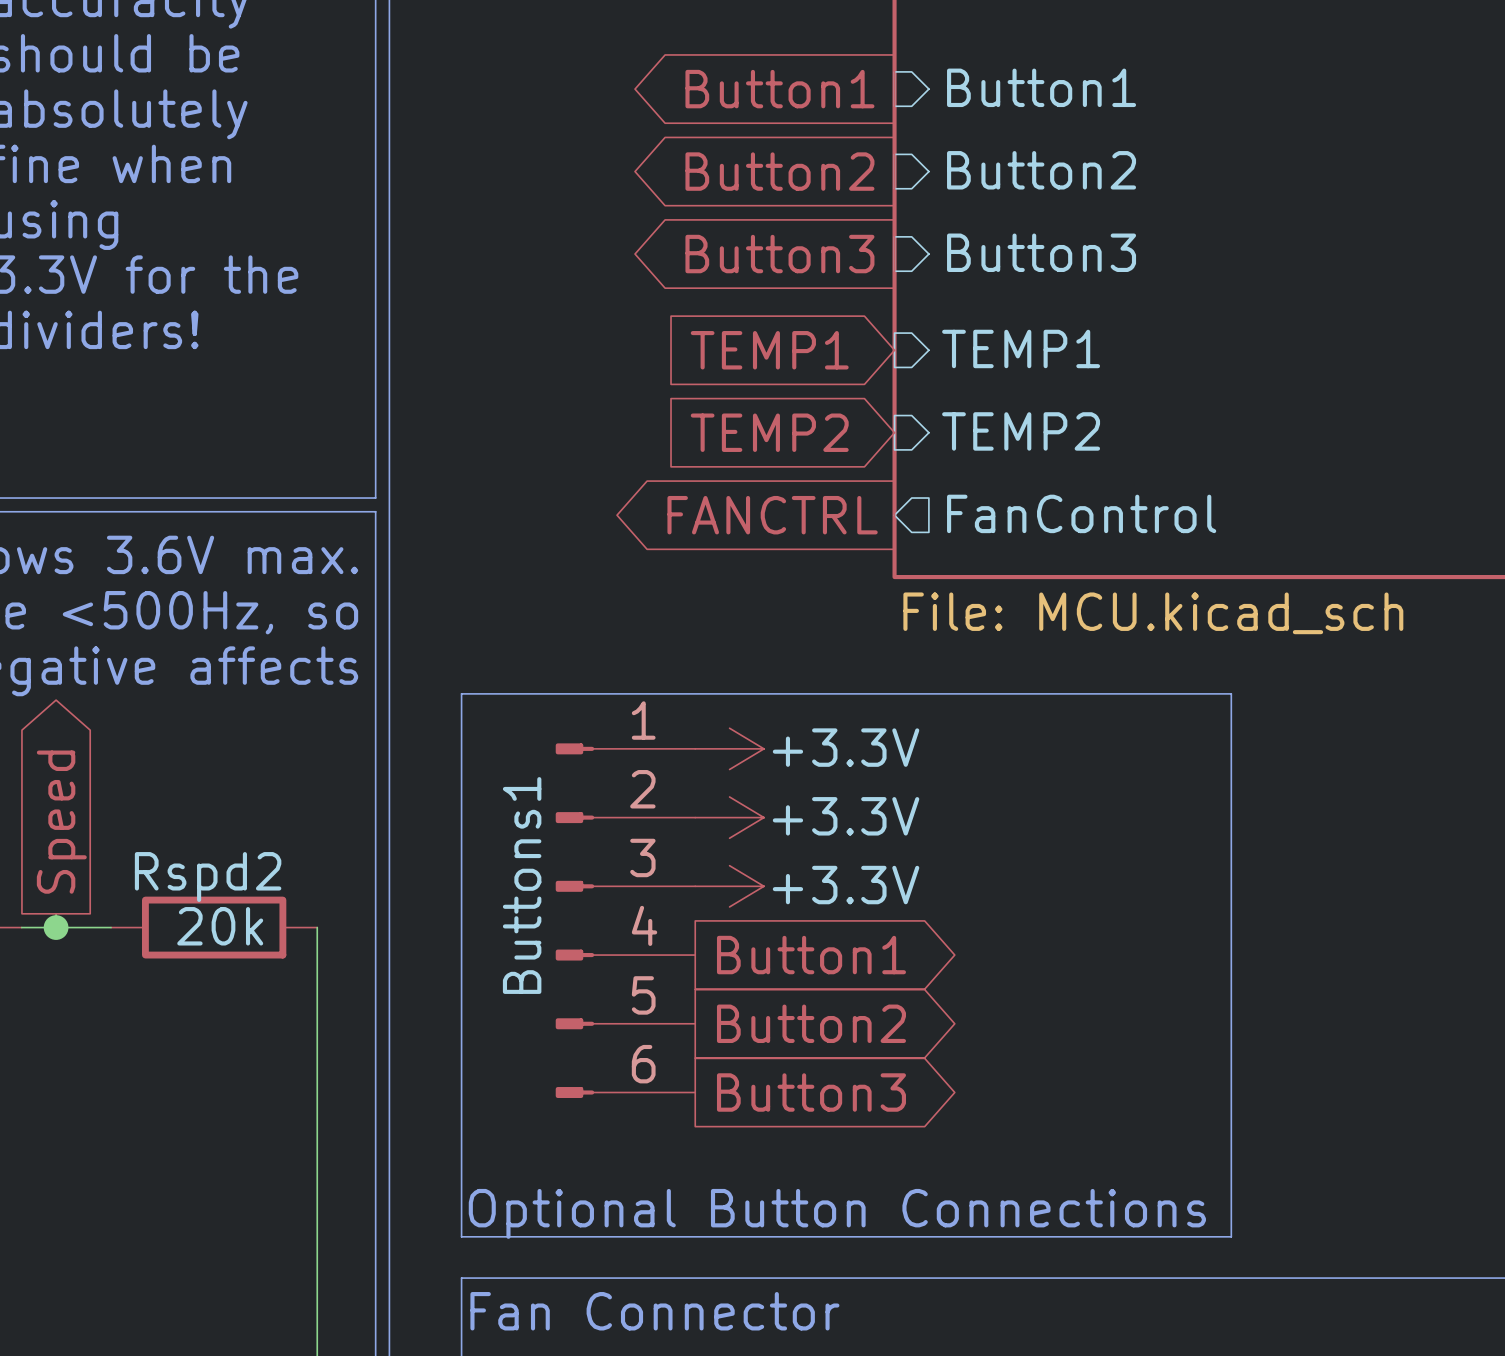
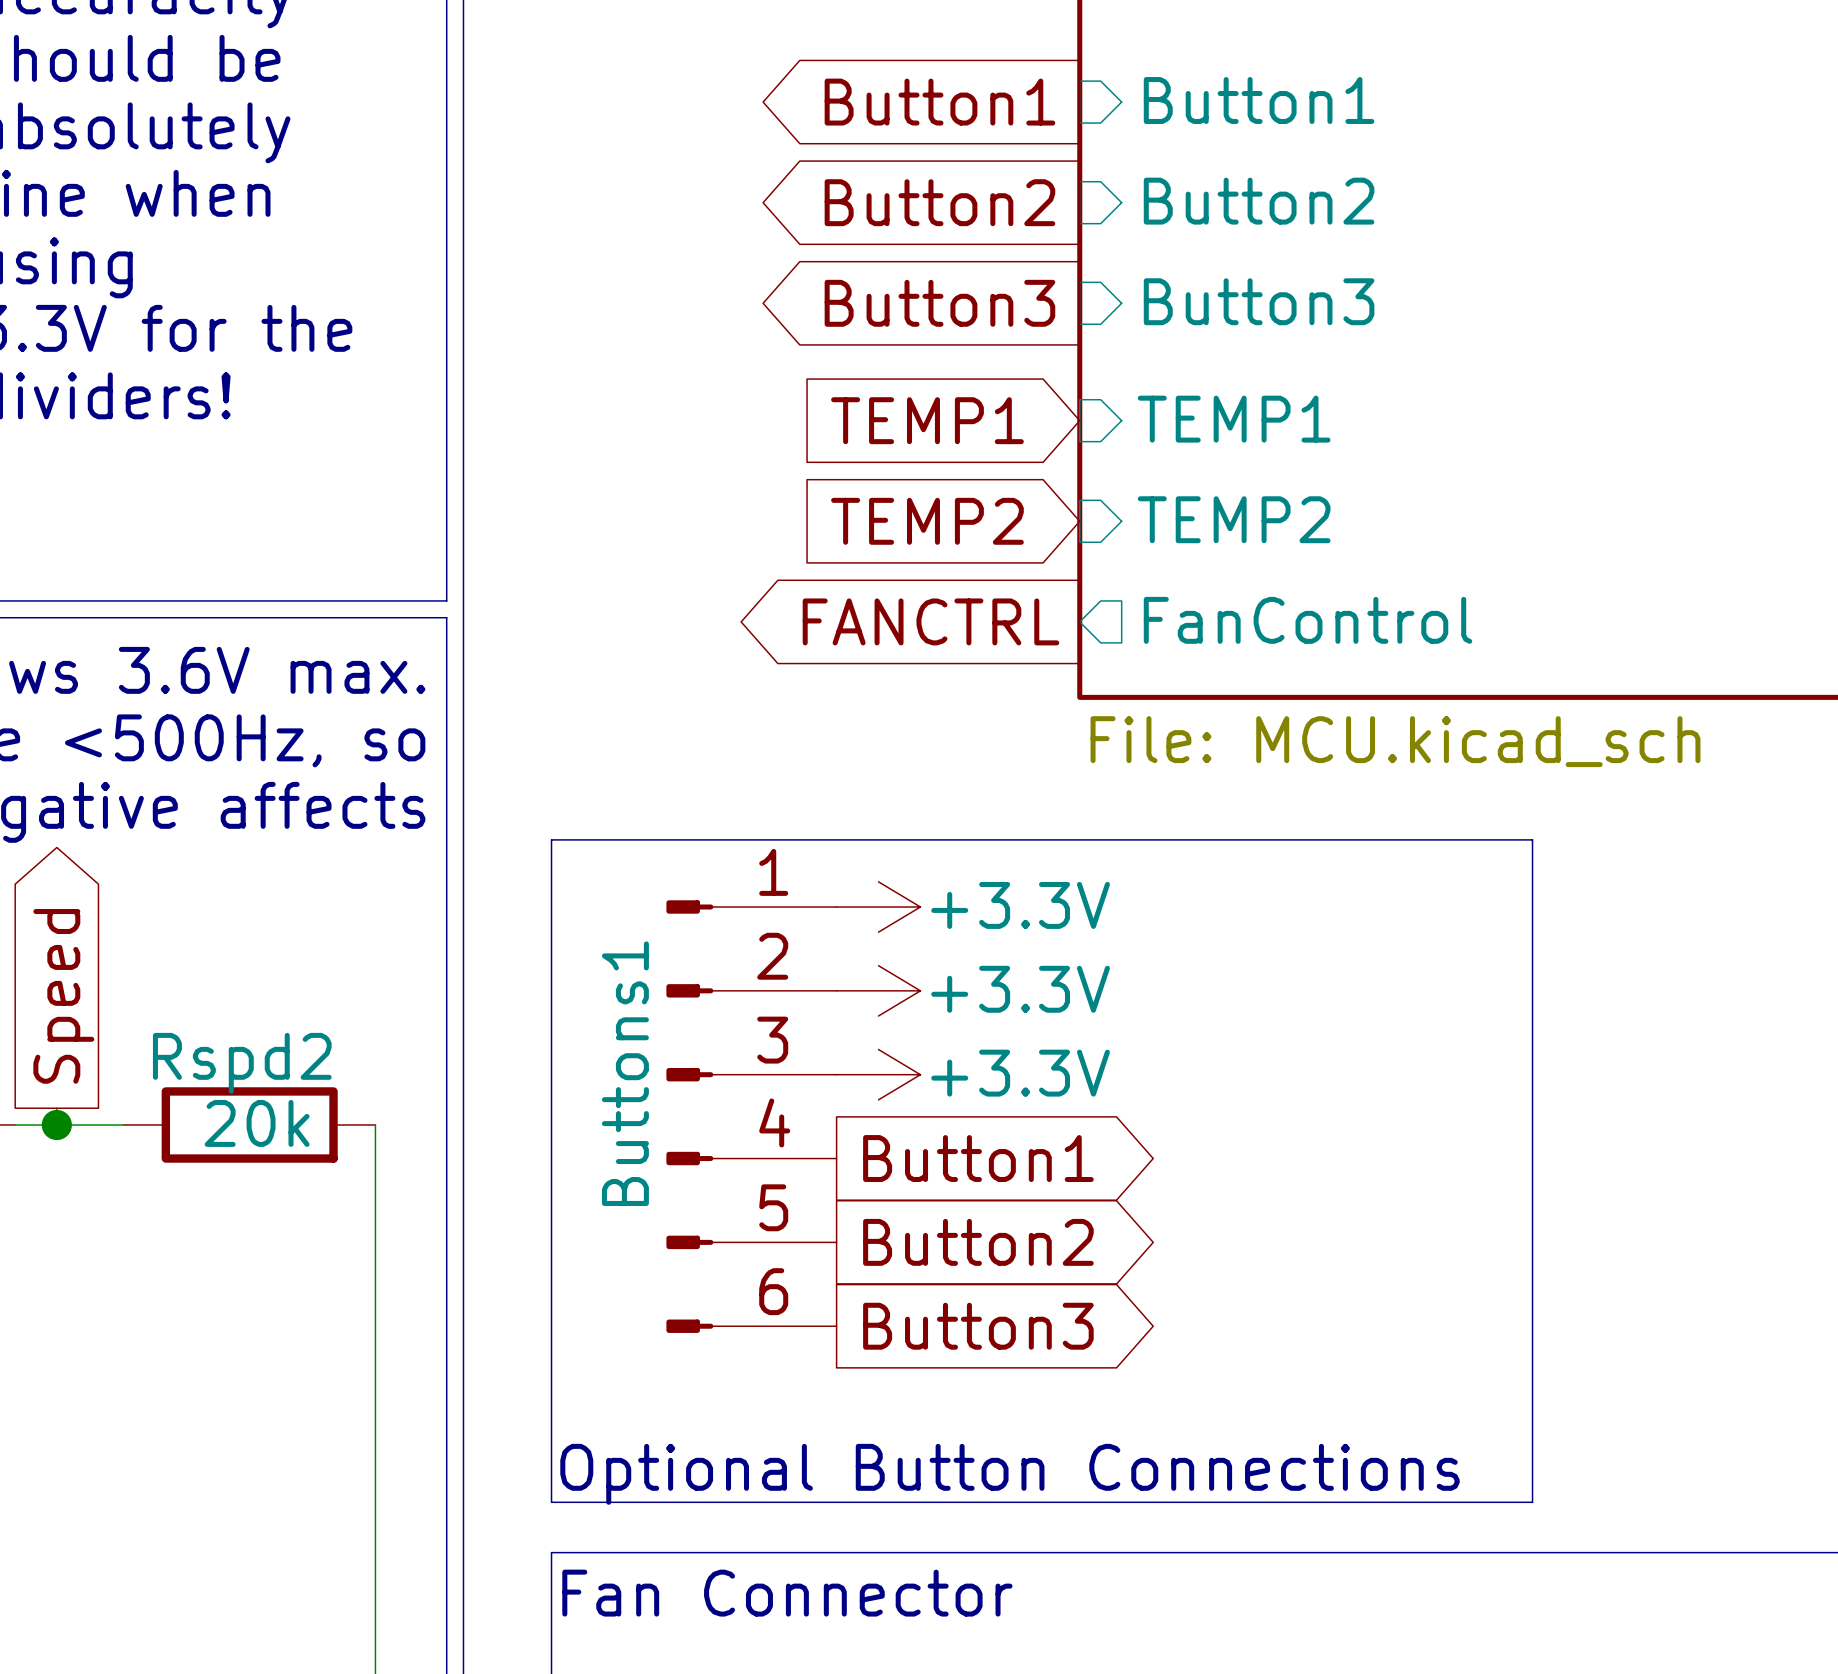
line: (1231, 693) (1231, 1236) -> (1490, 839) (1532, 839) (1532, 1502) (1490, 1502)

